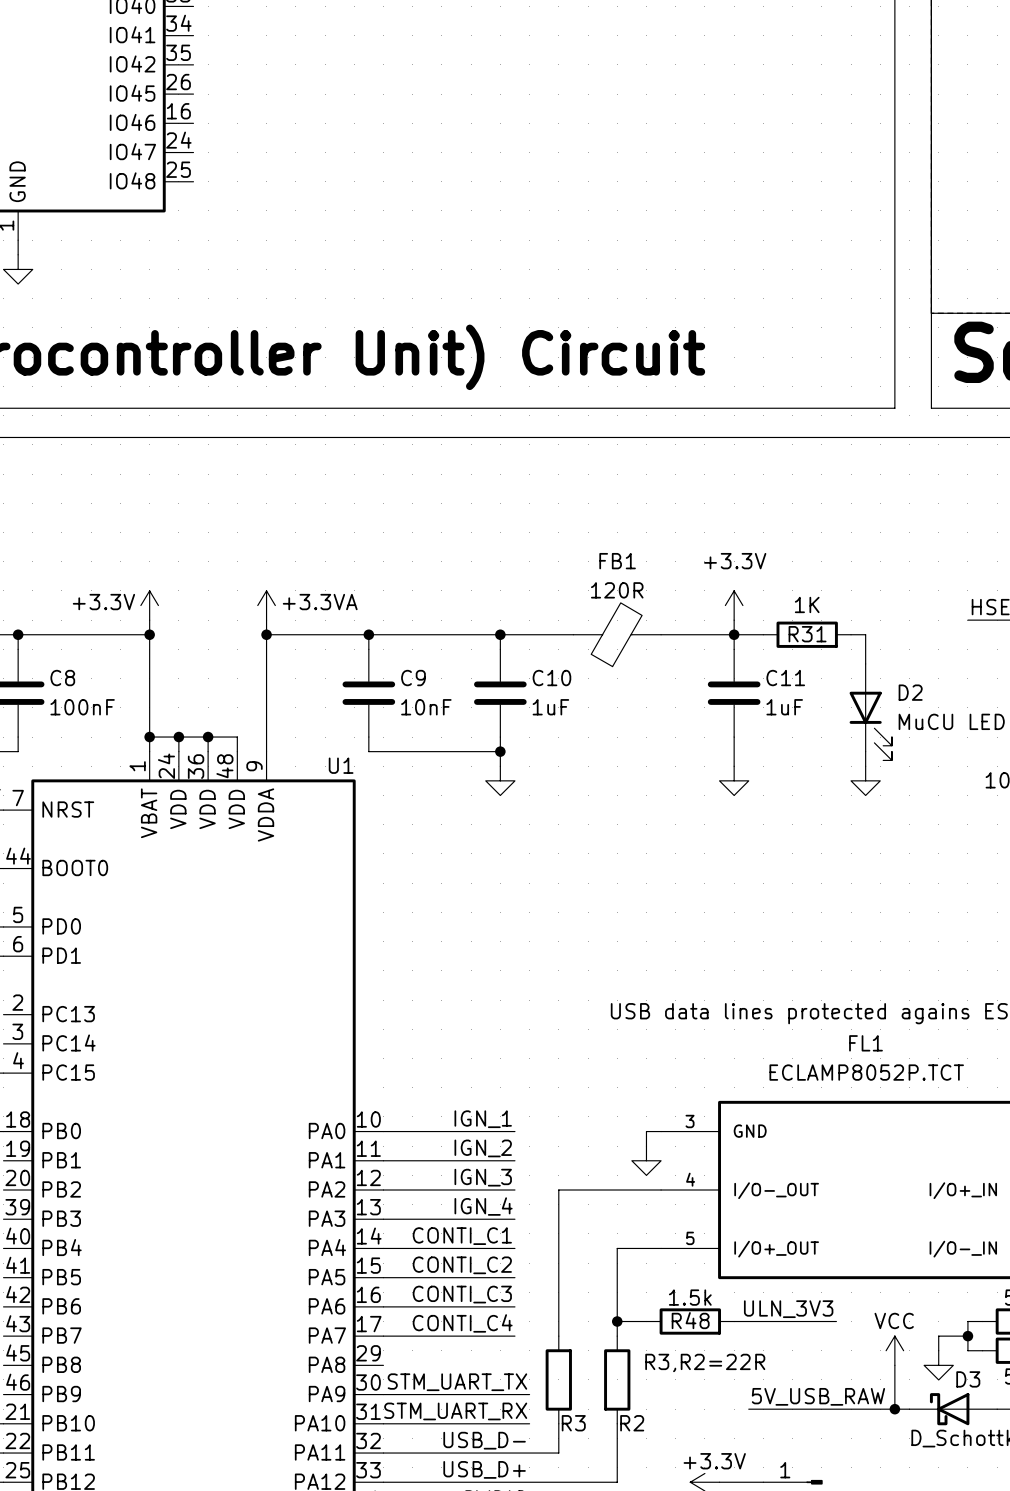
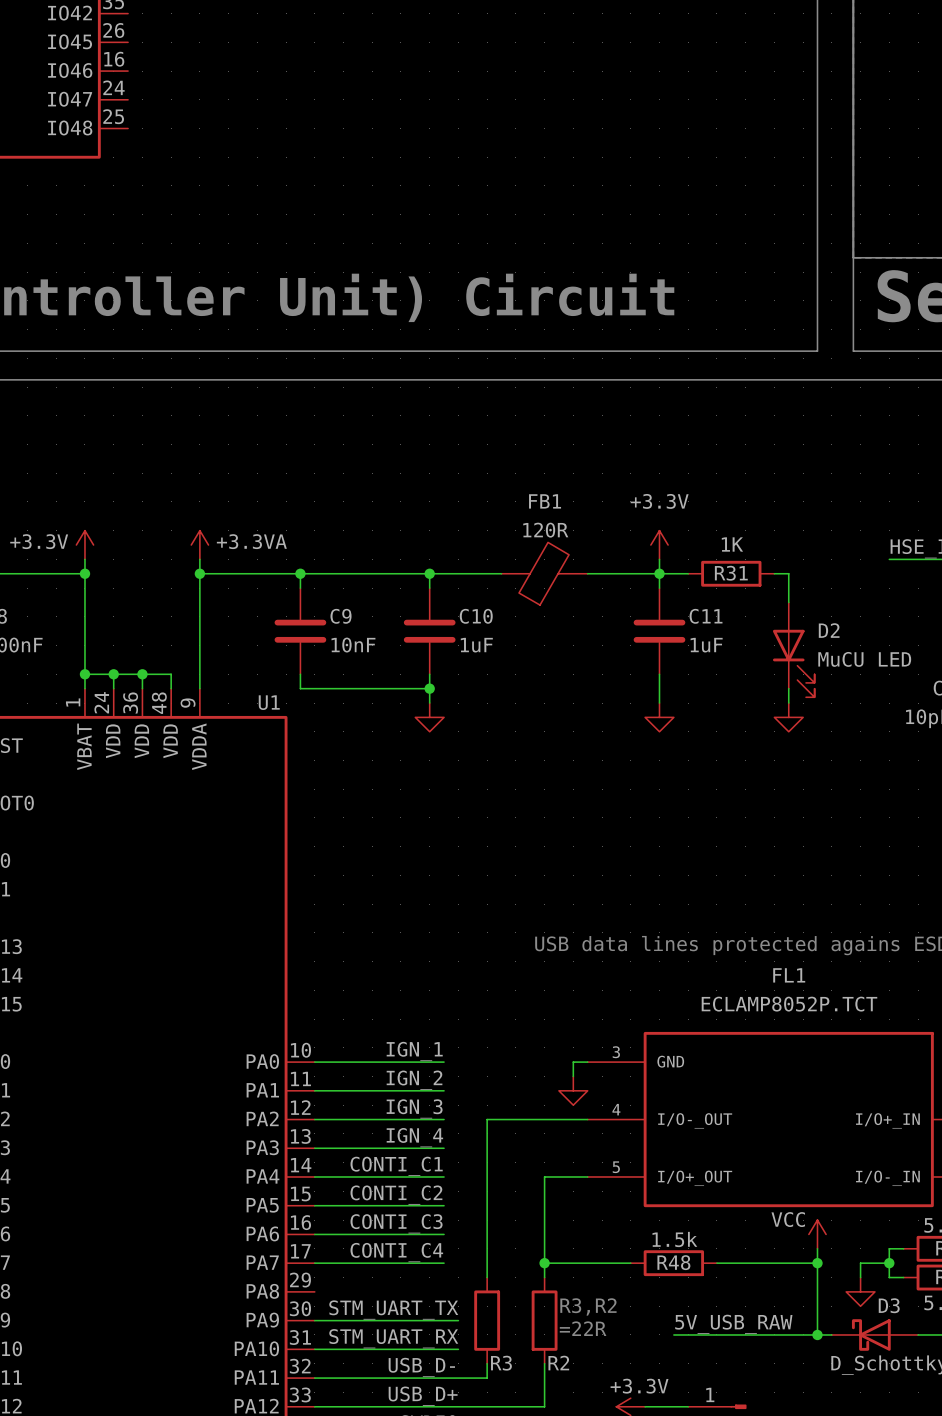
label: ULN_3V3 (788, 1309) -> none
power symbol text position: VCC (894, 1320) -> VCC (788, 1219)
wire: (617, 1321) (646, 1321) -> none
junction position: (617, 1321) -> (544, 1263)
R48 position: (690, 1321) -> (673, 1263)
wire: (734, 1321) (836, 1321) -> (716, 1263) (817, 1263)
wire: none -> (630, 1263) (544, 1263) (544, 1277)
junction: none -> (817, 1263)
power symbol position: VCC (894, 1350) -> VCC (817, 1234)
text: R3,R2=22R (705, 1362) -> R3,R2 (588, 1306)
R3 position: (558, 1379) -> (487, 1320)
R2 position: (617, 1379) -> (544, 1320)
text: none -> =22R (583, 1328)

